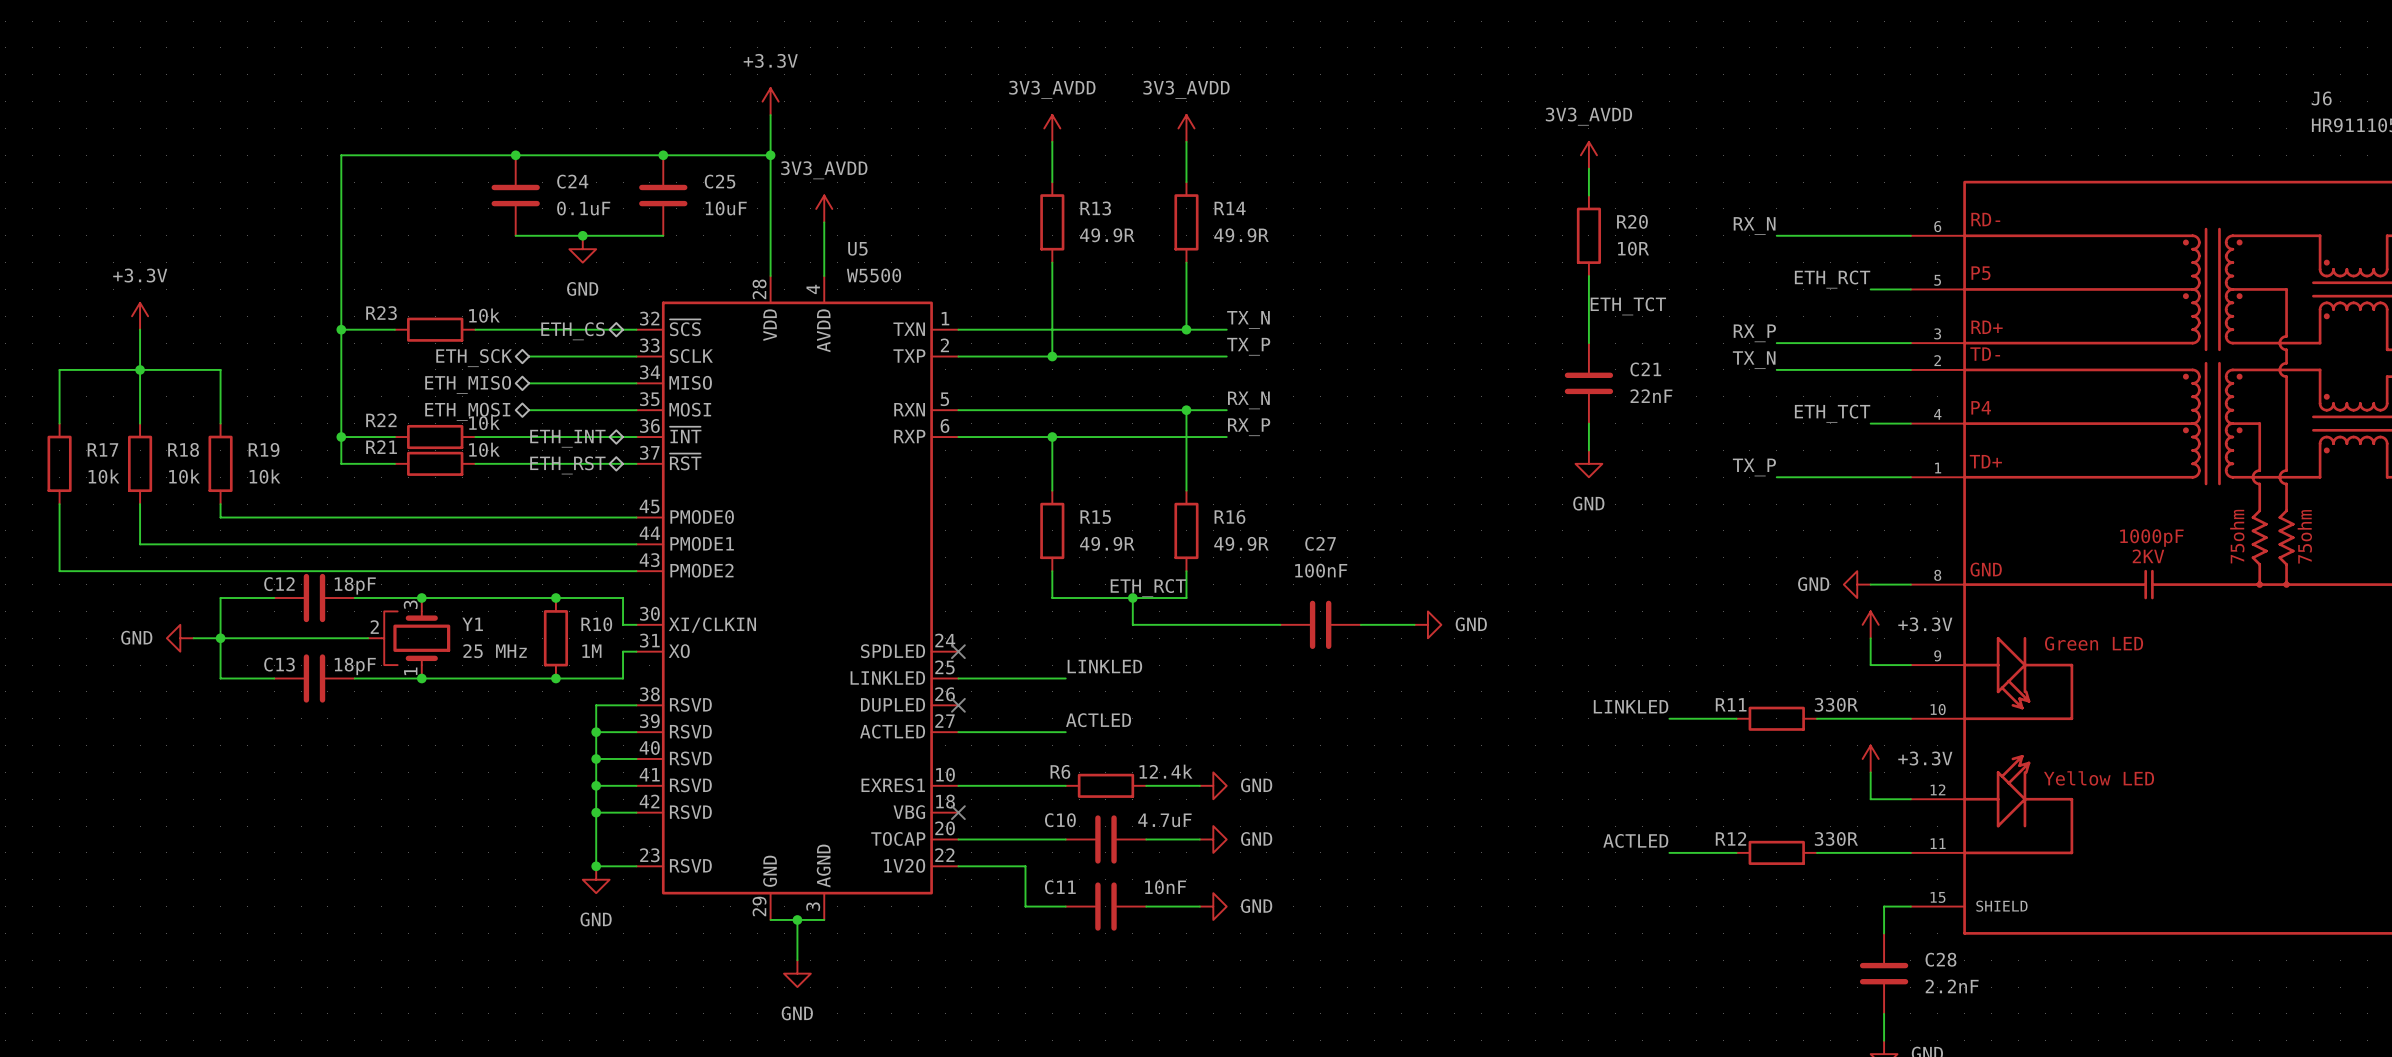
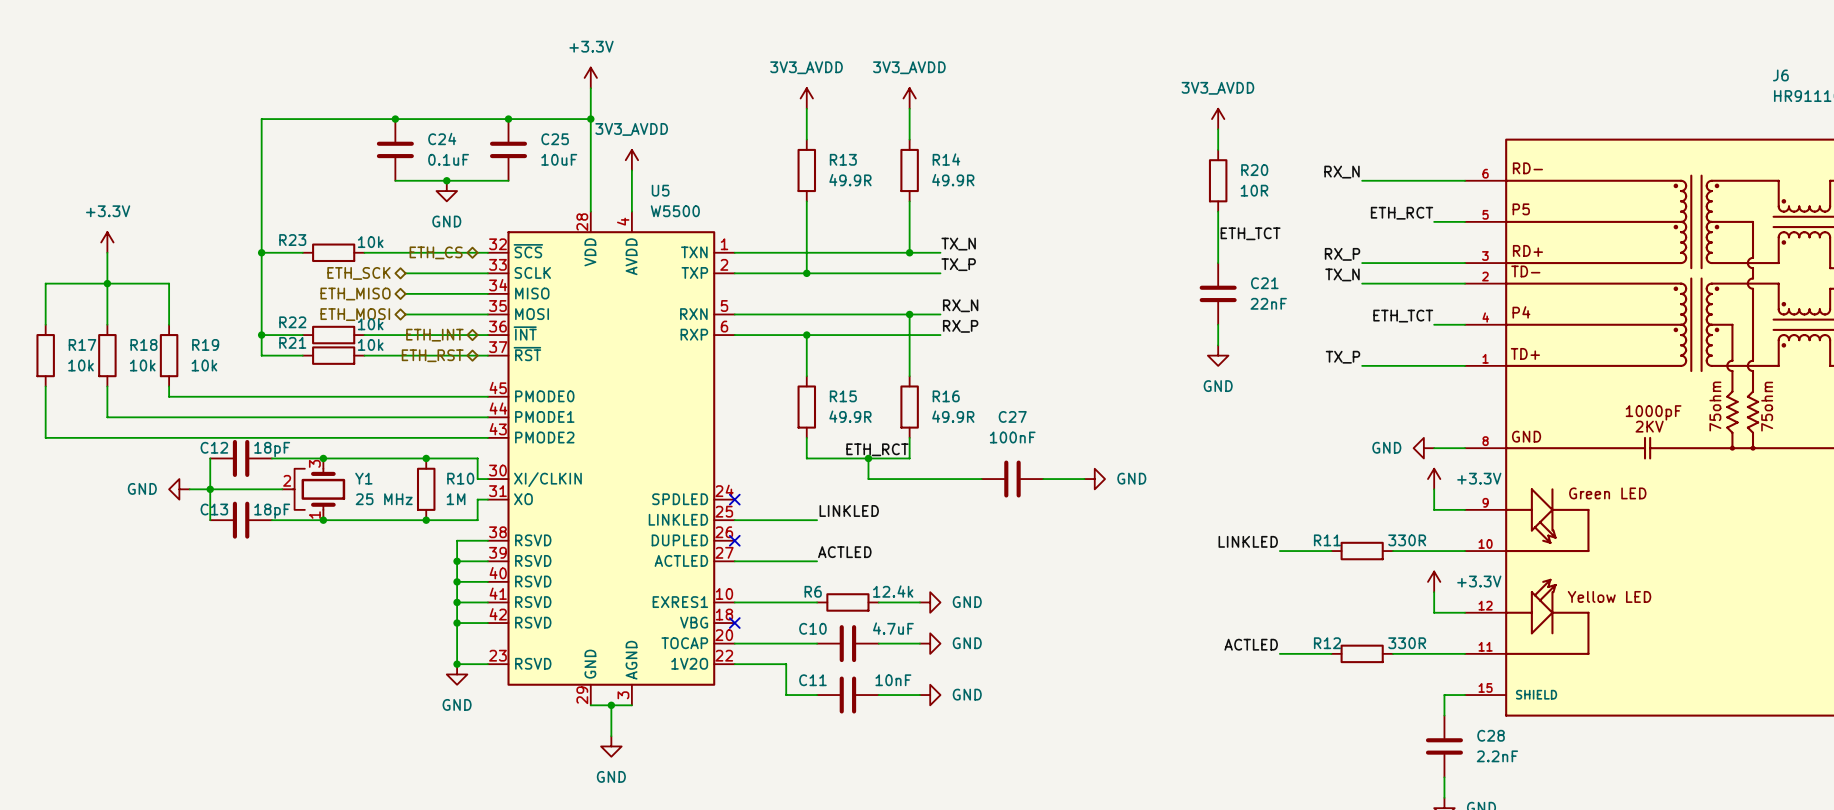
wire: (274, 598) (220, 598) (220, 678) (274, 678) -> (210, 458) (210, 520)
power symbol position: GND (180, 638) -> GND (179, 489)
wire: (193, 638) (247, 638) -> none
junction position: (220, 638) -> (210, 489)

